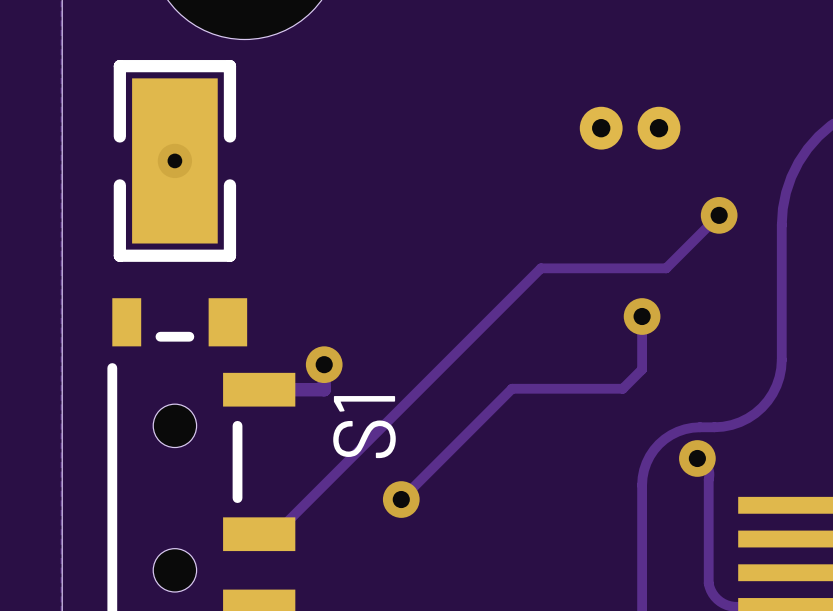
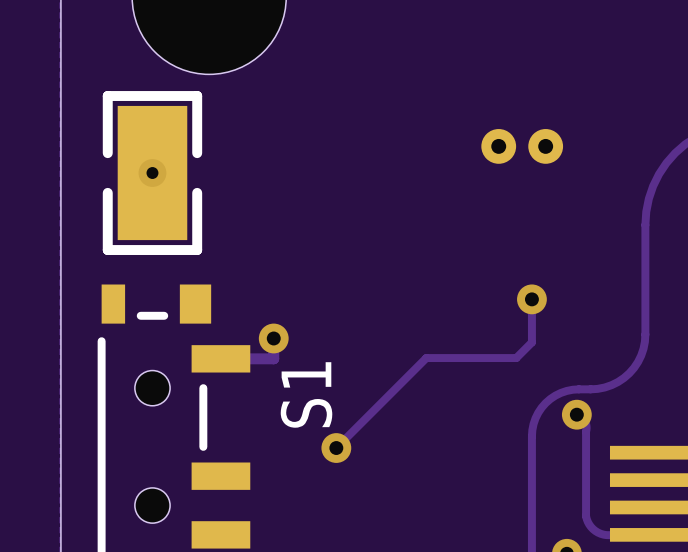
track: (719, 215) (666, 268) (540, 268) (275, 534) (259, 534) -> none
via: (719, 215) -> none

